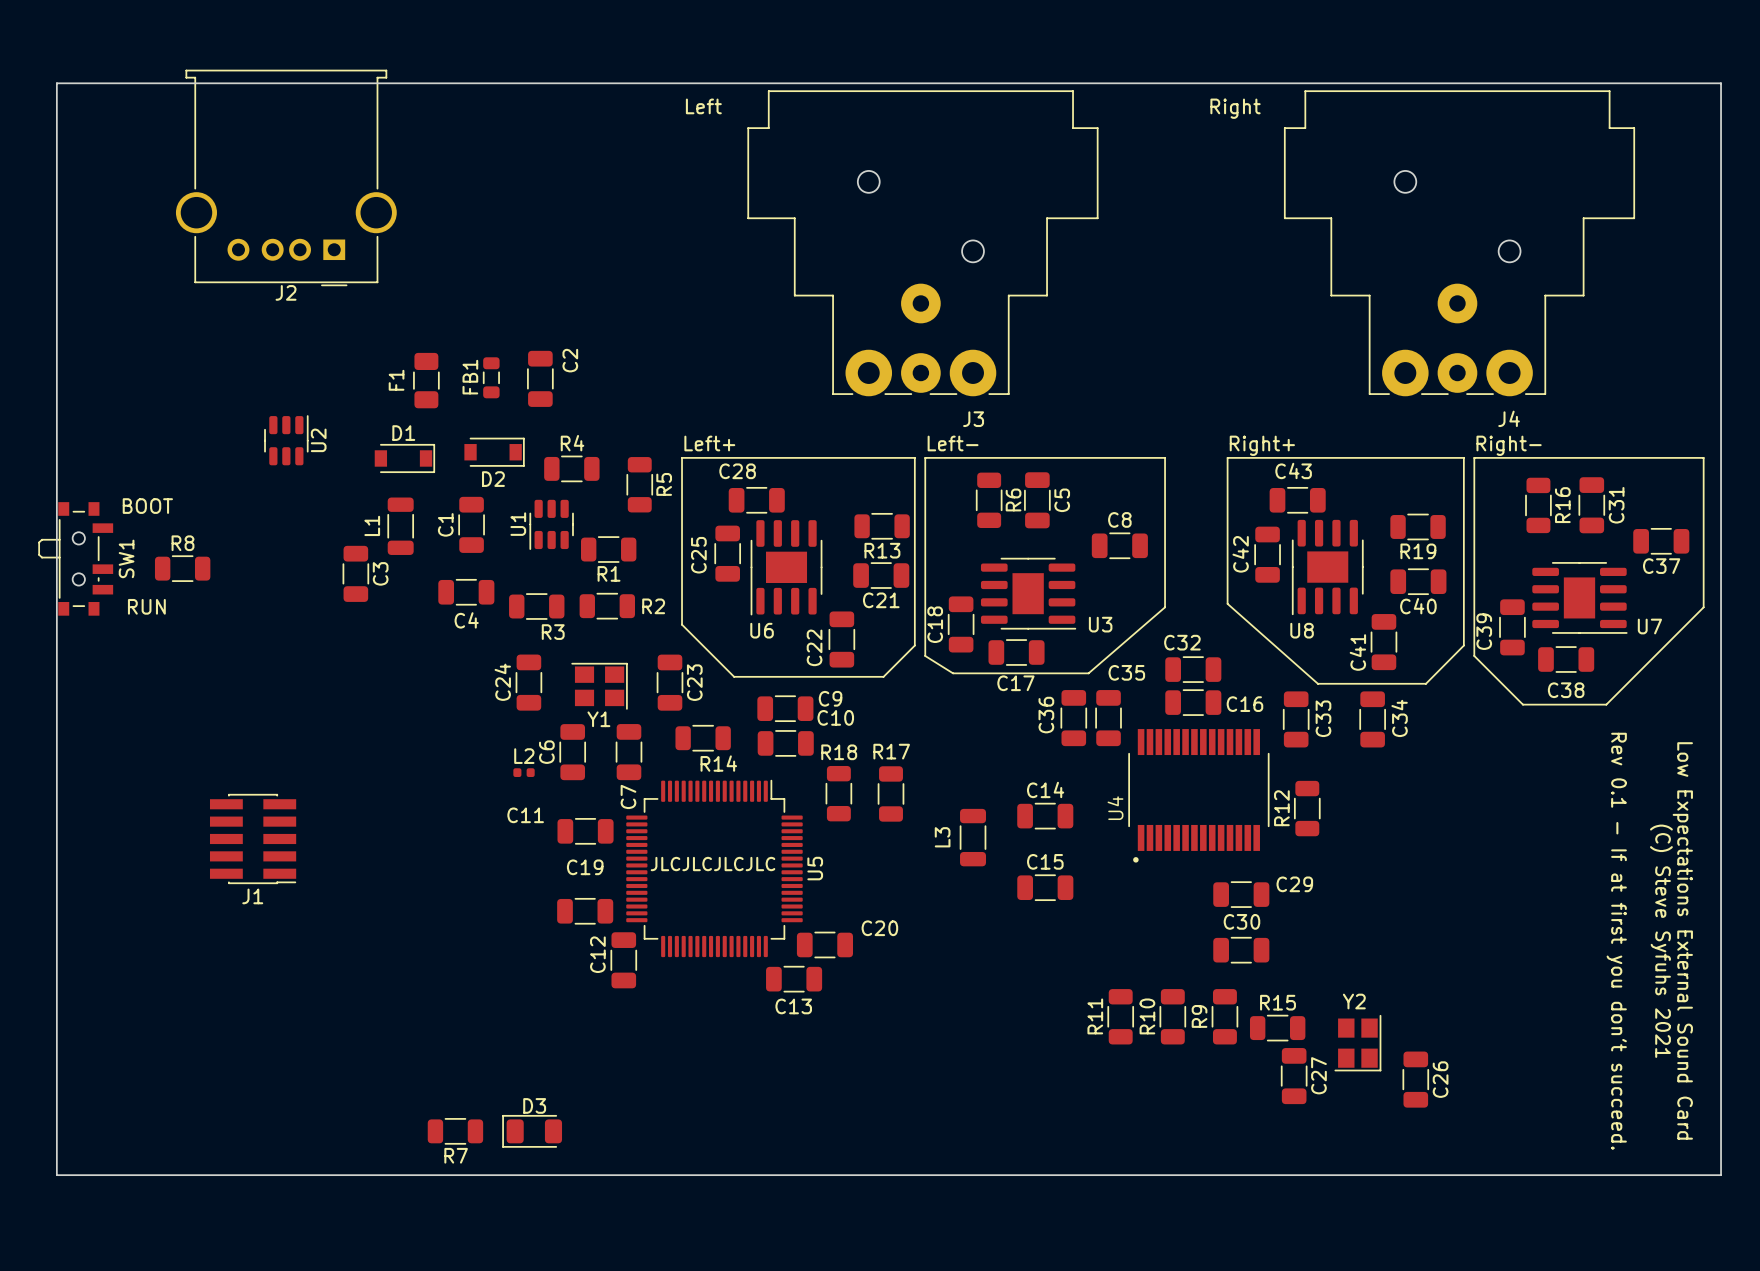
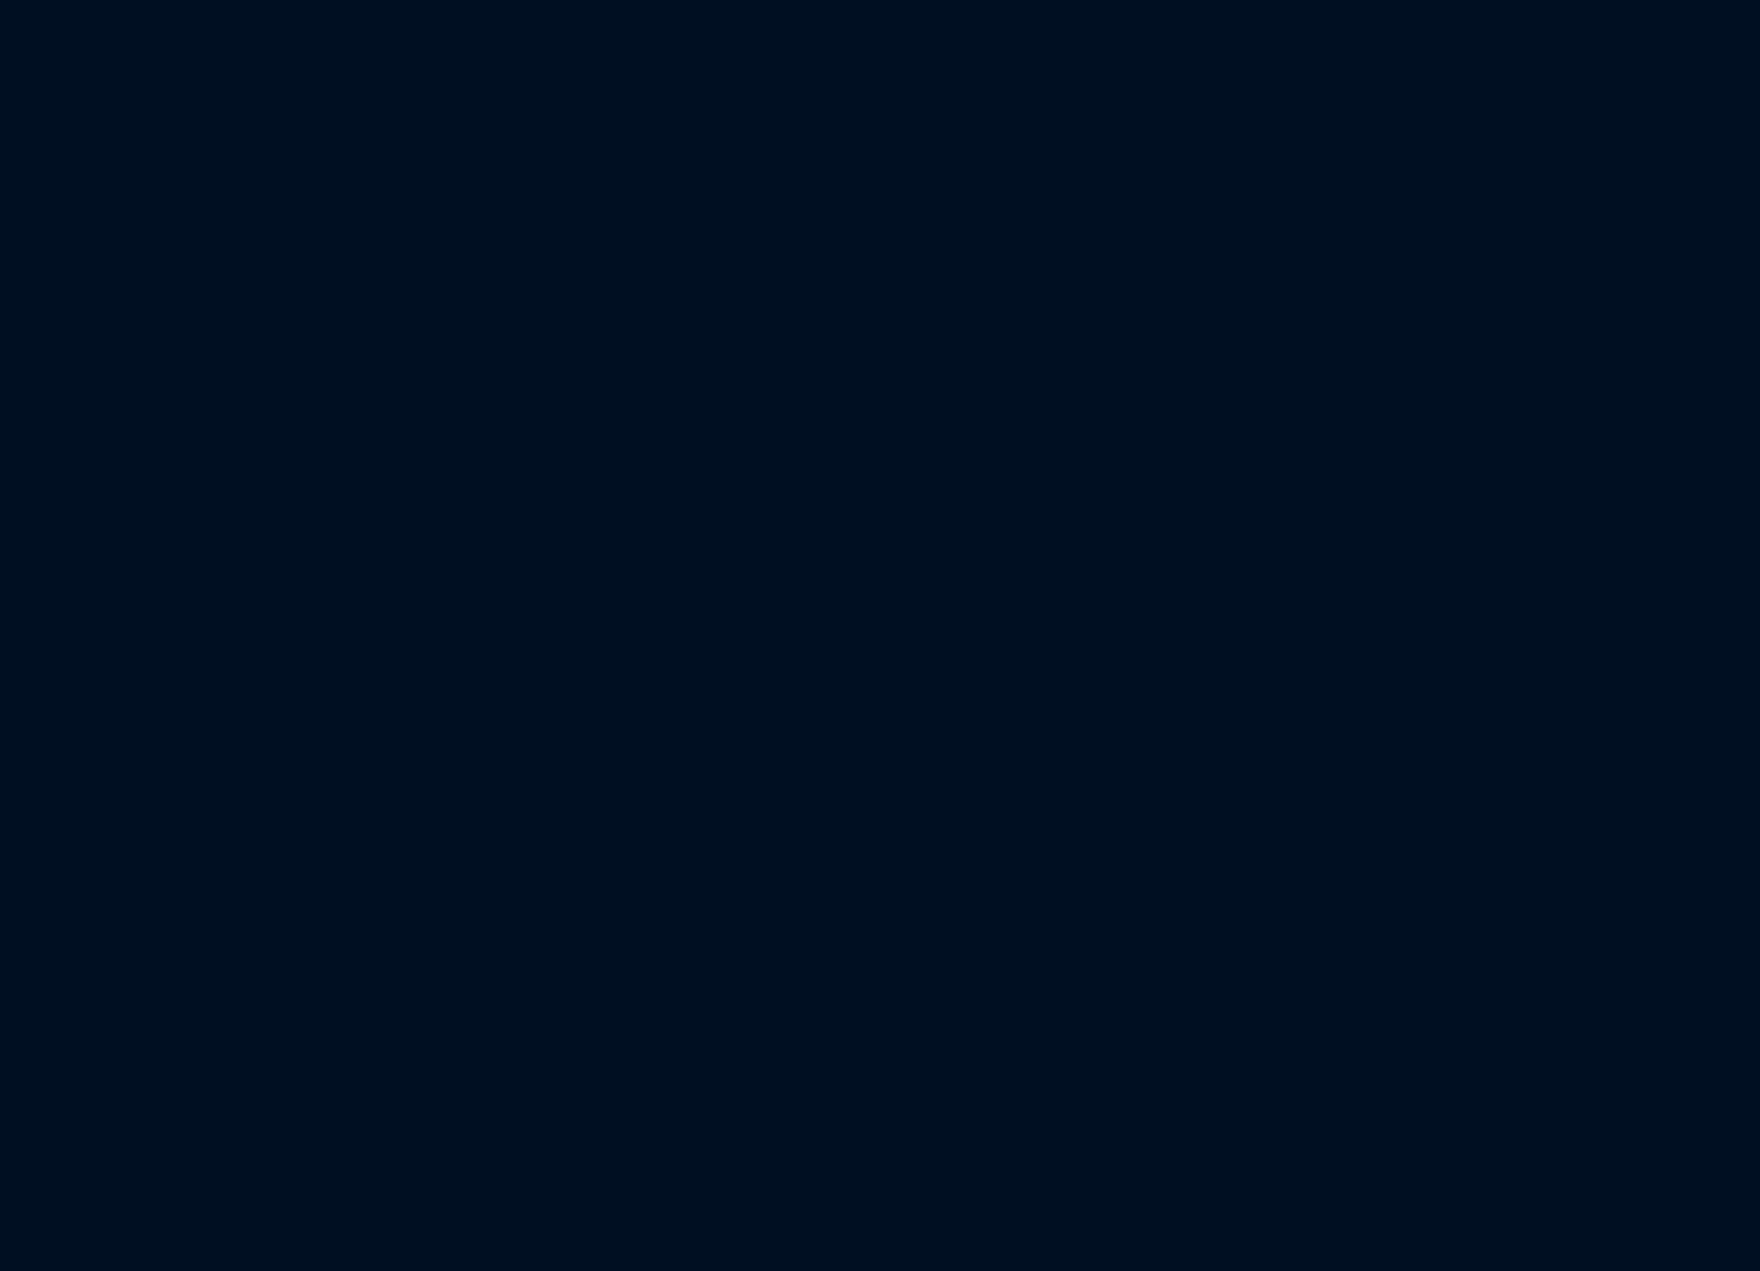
board edge: (56, 83) (1721, 83) (1721, 1175) (56, 1175) (56, 83) -> none
text: Left (703, 106) -> none
text: Right (1235, 108) -> none
J2: (286, 177) -> none
J3: (922, 243) -> none
J4: (1459, 243) -> none
FB1: (491, 377) -> none
C2: (540, 378) -> none
F1: (426, 380) -> none
U2: (286, 440) -> none
text: Left+ (709, 443) -> none
text: Left- (953, 443) -> none
text: Right+ (1262, 445) -> none
text: Right- (1509, 445) -> none
D2: (494, 452) -> none
line: (682, 457) (914, 457) (914, 645) (883, 676) (734, 676) (682, 624) (682, 457) -> none
line: (925, 457) (1165, 457) (1165, 607) (1088, 673) (953, 673) (925, 655) (925, 457) -> none
line: (1227, 457) (1463, 457) (1463, 645) (1425, 683) (1317, 683) (1227, 603) (1227, 457) -> none
line: (1474, 457) (1474, 655) (1522, 704) (1606, 704) (1703, 607) (1703, 457) (1474, 457) -> none
D1: (404, 458) -> none
R4: (571, 468) -> none
R5: (639, 484) -> none
C28: (756, 500) -> none
R6: (989, 500) -> none
C5: (1037, 500) -> none
C43: (1297, 500) -> none
R16: (1538, 505) -> none
C31: (1591, 505) -> none
text: BOOT (147, 506) -> none
C1: (471, 524) -> none
U1: (551, 524) -> none
L1: (400, 526) -> none
R13: (882, 526) -> none
R19: (1418, 526) -> none
C37: (1661, 541) -> none
C8: (1119, 545) -> none
R1: (608, 549) -> none
C25: (727, 553) -> none
C42: (1267, 554) -> none
SW1: (75, 558) -> none
U6: (786, 567) -> none
U8: (1327, 567) -> none
R8: (182, 568) -> none
C3: (355, 573) -> none
C21: (881, 575) -> none
C40: (1418, 581) -> none
C4: (466, 592) -> none
U3: (1028, 593) -> none
U7: (1579, 597) -> none
text: RUN (146, 606) -> none
R3: (536, 606) -> none
R2: (607, 606) -> none
C18: (961, 624) -> none
C39: (1512, 627) -> none
C22: (841, 639) -> none
C41: (1383, 642) -> none
C17: (1016, 652) -> none
C38: (1566, 659) -> none
C32: (1193, 669) -> none
C24: (528, 682) -> none
C23: (670, 682) -> none
Y1: (599, 686) -> none
C16: (1193, 702) -> none
C9: (785, 708) -> none
C36: (1073, 718) -> none
C35: (1108, 718) -> none
C33: (1296, 719) -> none
C34: (1372, 719) -> none
R14: (703, 738) -> none
C10: (785, 743) -> none
C6: (572, 752) -> none
C7: (628, 752) -> none
L2: (524, 772) -> none
R18: (838, 793) -> none
R17: (891, 793) -> none
U4: (1198, 795) -> none
R12: (1307, 808) -> none
C14: (1045, 816) -> none
C11: (585, 831) -> none
L3: (973, 837) -> none
J1: (253, 838) -> none
text: JLCJLCJLCJLC (712, 864) -> none
U5: (714, 868) -> none
C15: (1045, 887) -> none
C29: (1241, 894) -> none
C19: (585, 911) -> none
text: Low Expectations External Sound Card (1682, 940) -> none
text: Rev 0.1 - If at first you don't succeed. (1616, 941) -> none
text: (C) Steve Syfuhs 2021 (1661, 941) -> none
C13: (824, 944) -> none
C30: (1241, 950) -> none
C12: (623, 960) -> none
C20: (794, 979) -> none
R11: (1120, 1016) -> none
R10: (1172, 1016) -> none
R9: (1224, 1016) -> none
R15: (1277, 1028) -> none
Y2: (1357, 1043) -> none
C27: (1294, 1076) -> none
C26: (1415, 1079) -> none
R7: (455, 1131) -> none
D3: (532, 1131) -> none

